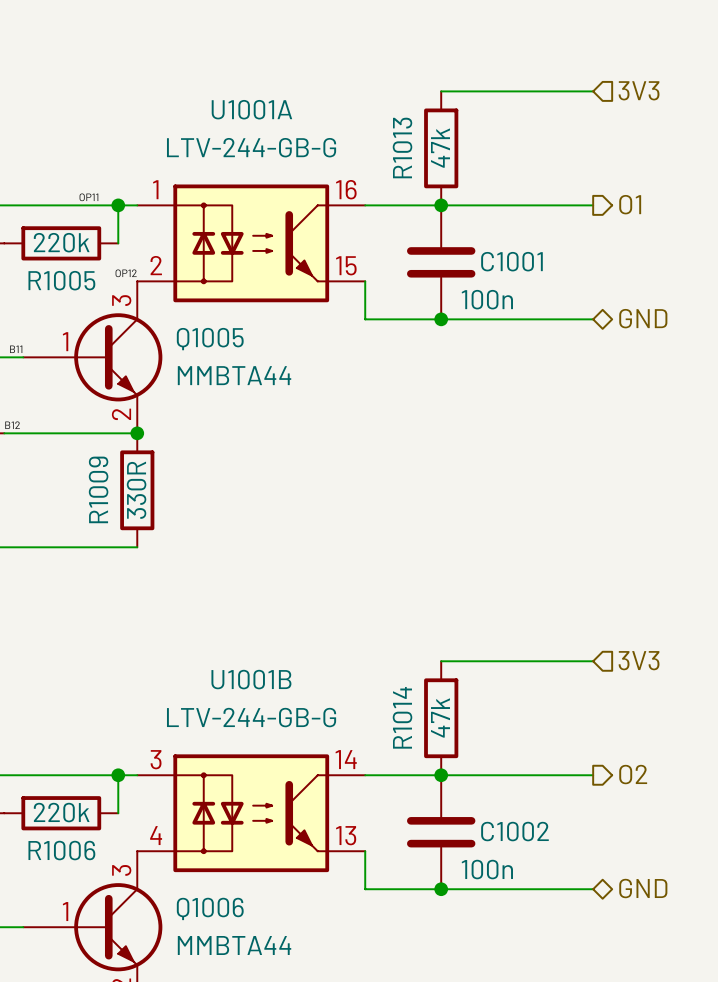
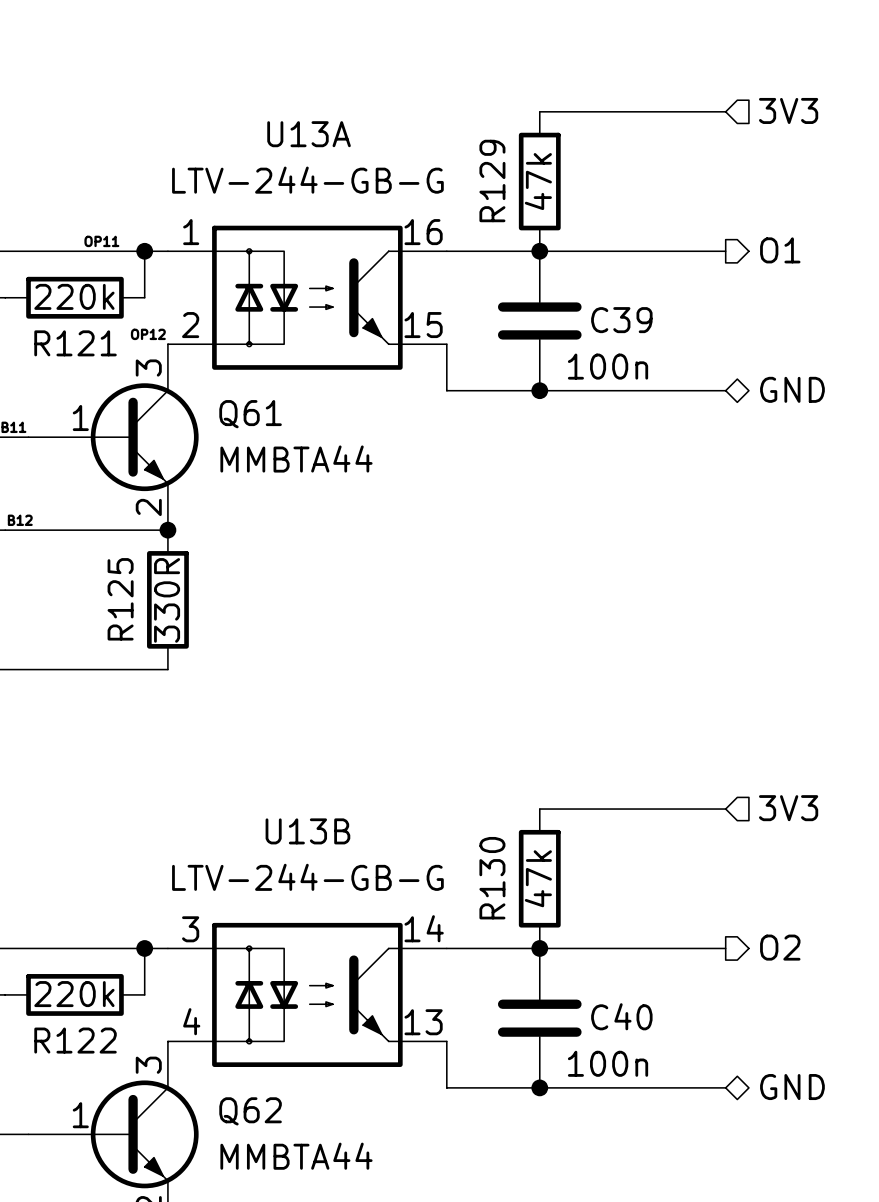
U1001A name: U1001A (251, 109) -> U13A (309, 134)
R1013 name: R1013 (402, 148) -> R129 (492, 180)
C1001 name: C1001 (511, 261) -> C39 (621, 320)
R1005 name: R1005 (61, 280) -> R121 (75, 343)
Q1005 name: Q1005 (210, 339) -> Q61 (250, 414)
R1009 name: R1009 (98, 489) -> R125 (120, 599)
U1001B name: U1001B (251, 679) -> U13B (307, 831)
R1014 name: R1014 (402, 717) -> R130 (492, 878)
C1002 name: C1002 (514, 831) -> C40 (621, 1016)
R1006 name: R1006 (61, 850) -> R122 (75, 1040)
Q1006 name: Q1006 (210, 908) -> Q62 (250, 1111)

